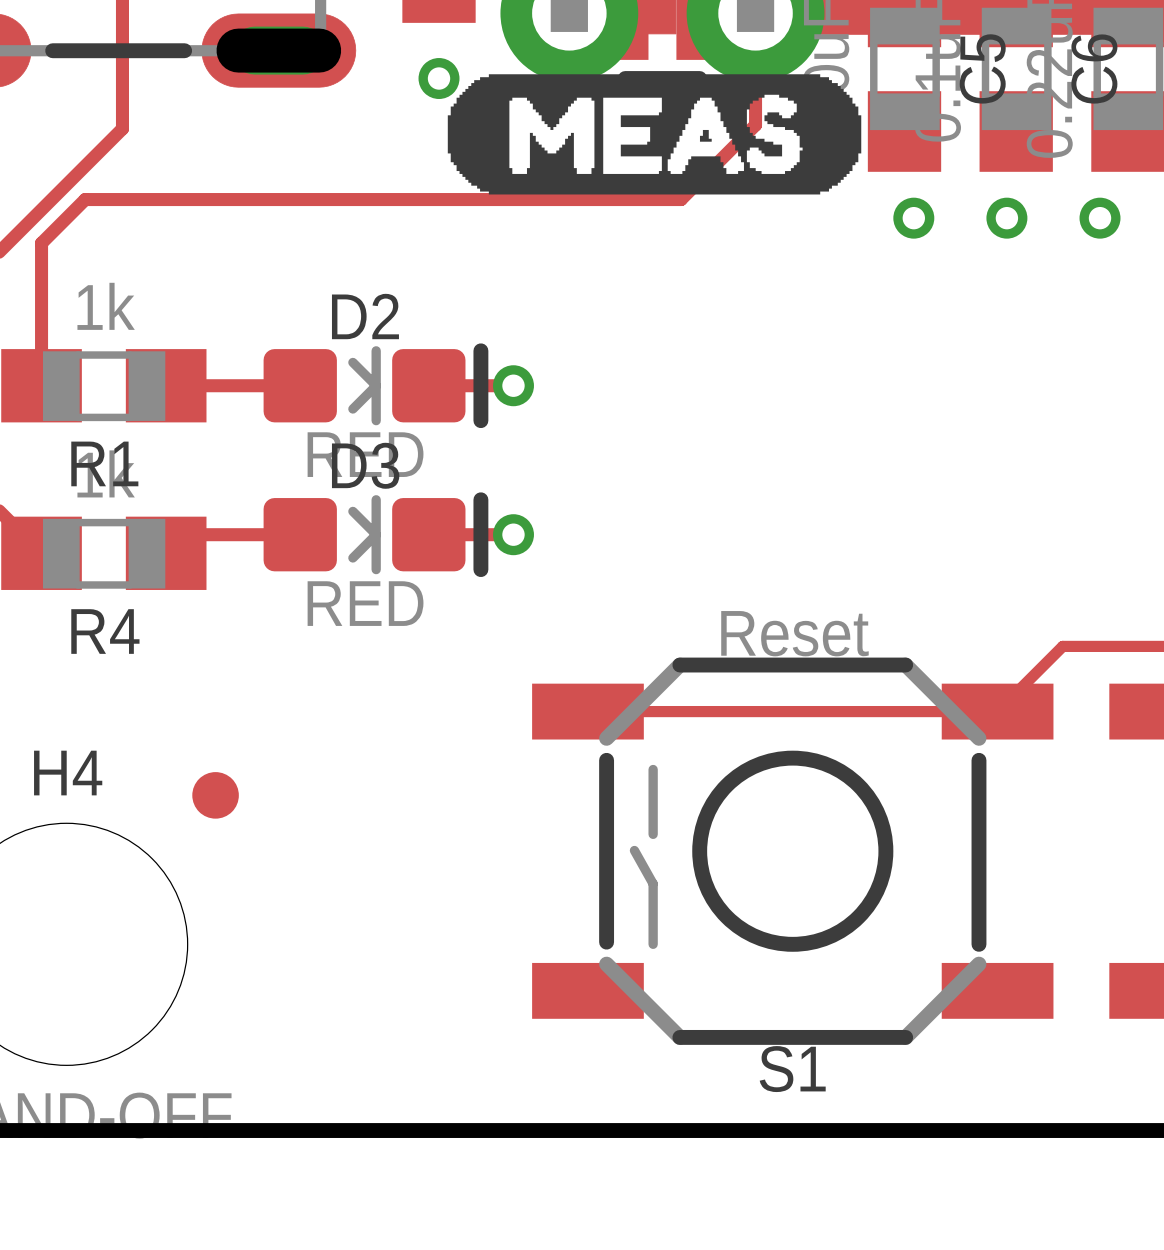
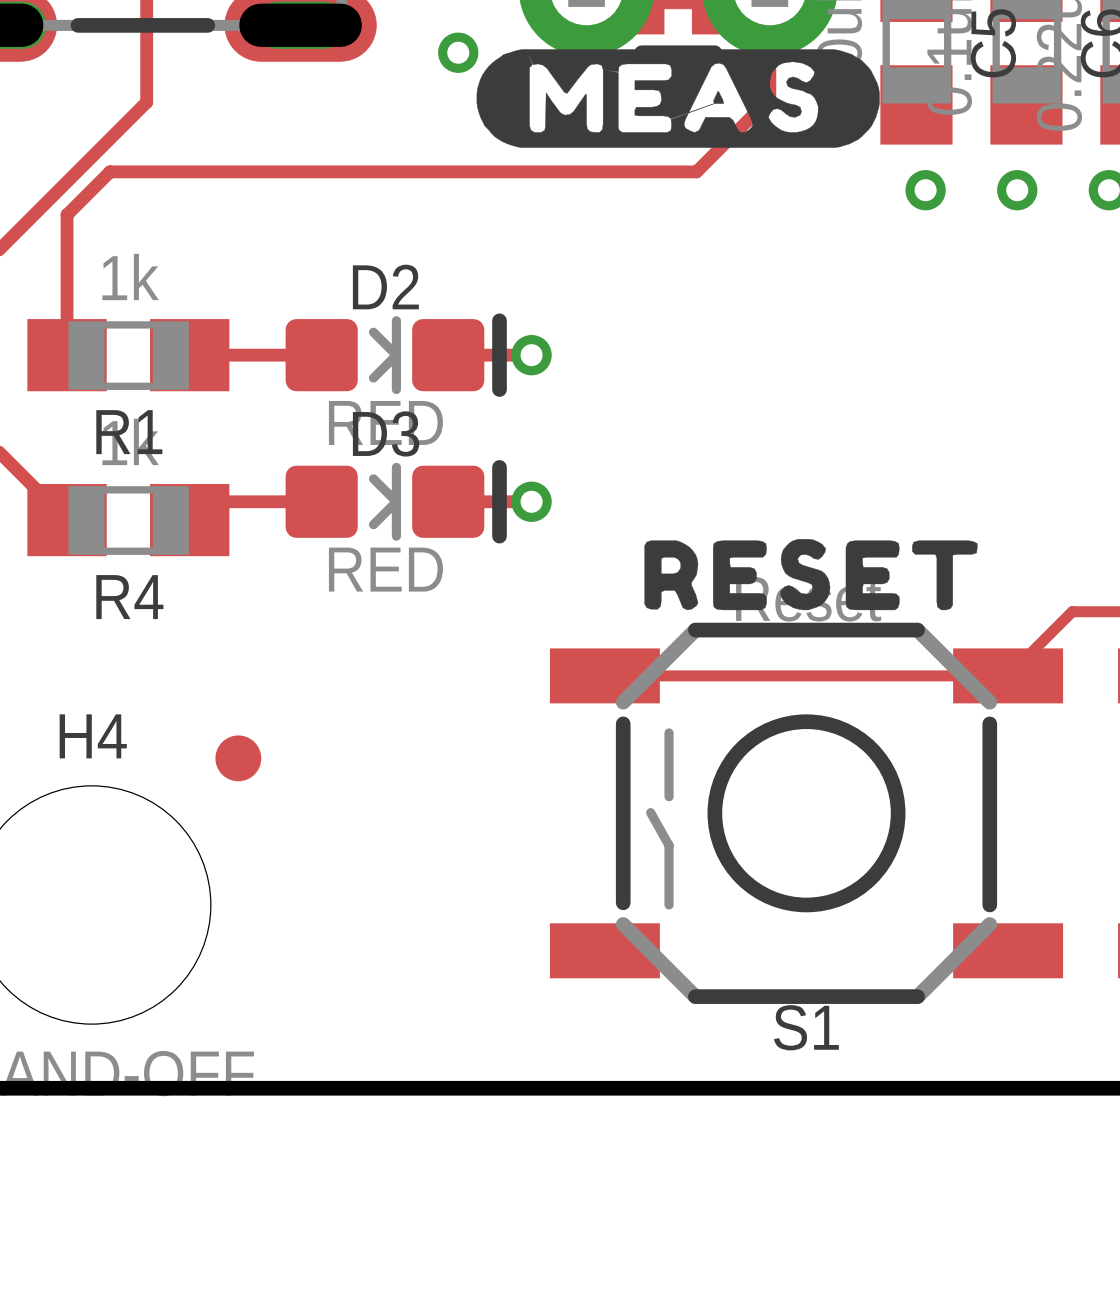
drawing shape: [447, 74, 862, 195] -> [476, 49, 880, 148]
drawing: none -> [644, 539, 978, 611]

